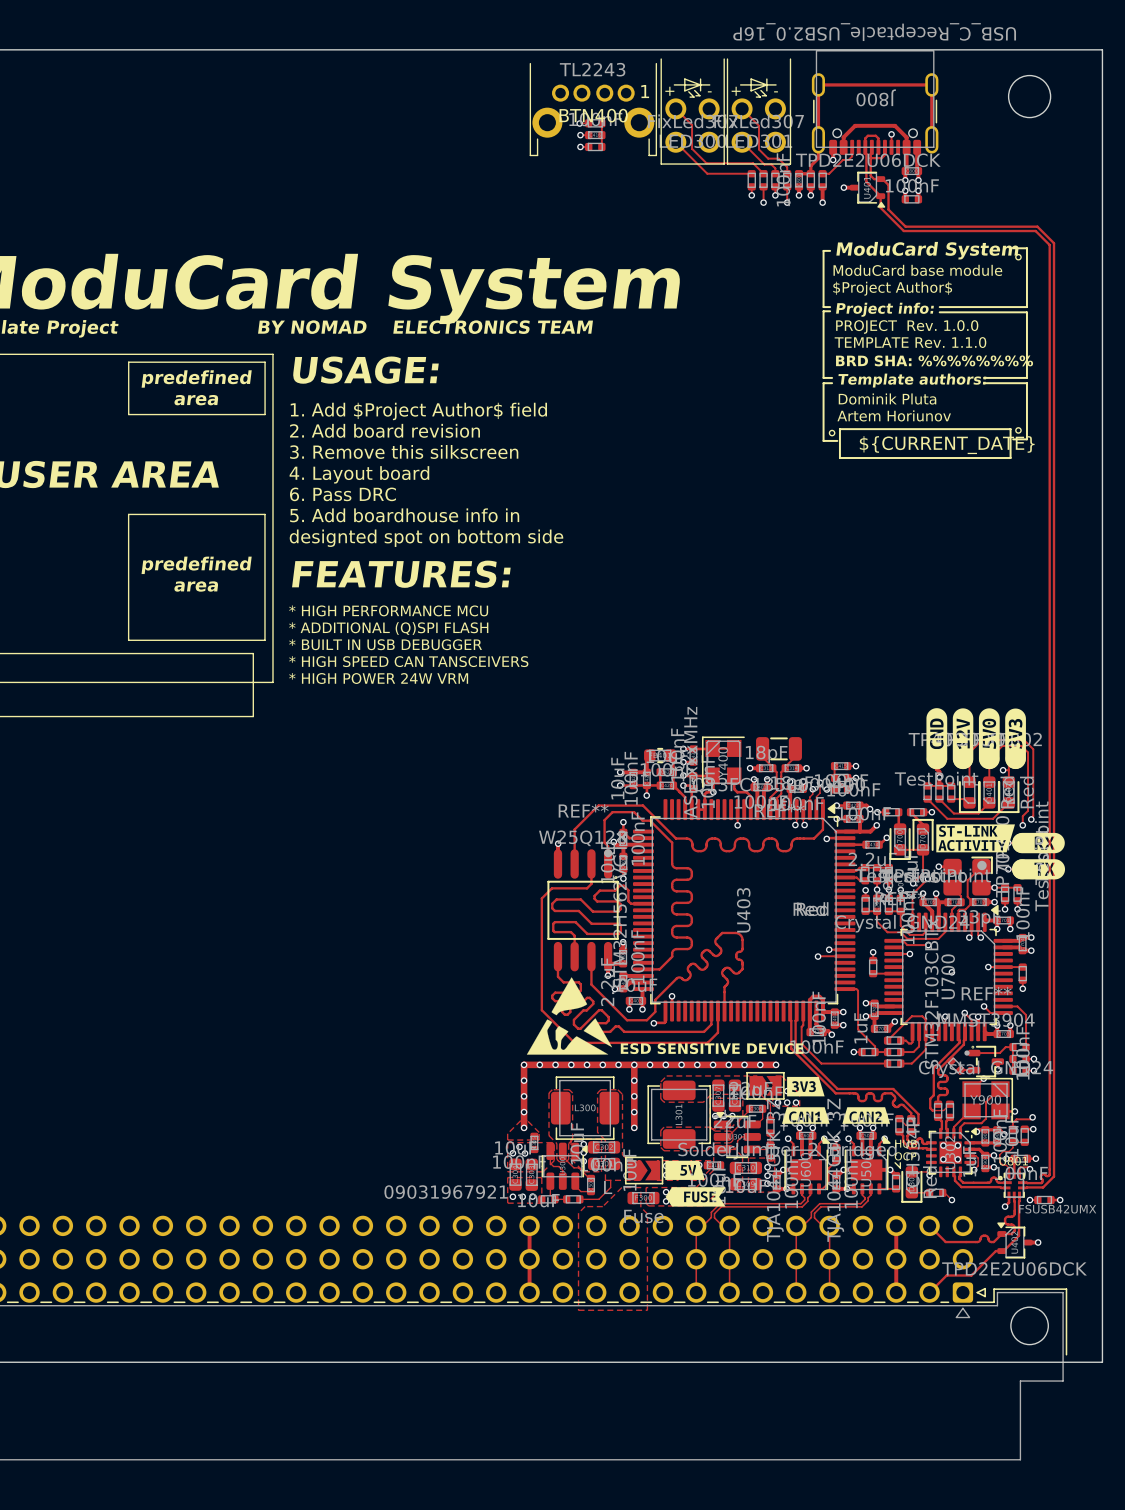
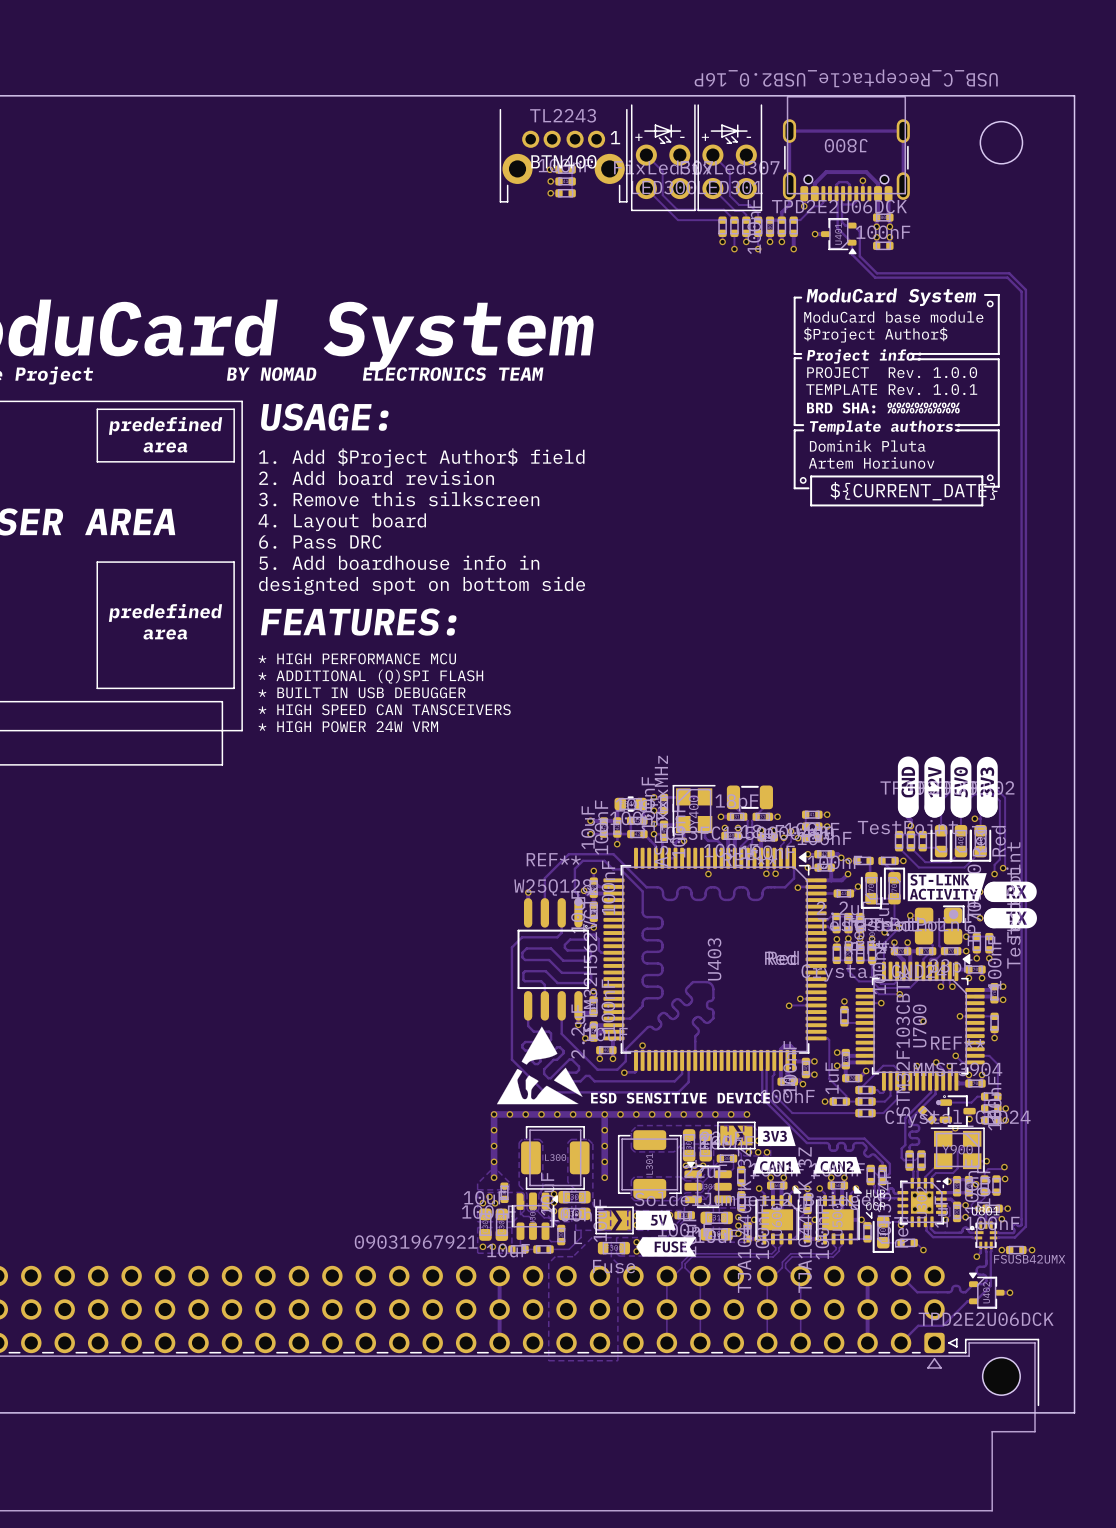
text: TEMPLATE Rev. 1.1.0 (910, 342) -> TEMPLATE Rev. 1.0.1 (891, 389)

